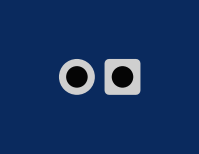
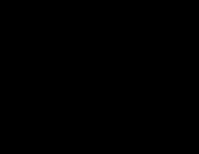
part: (99, 76) -> none

